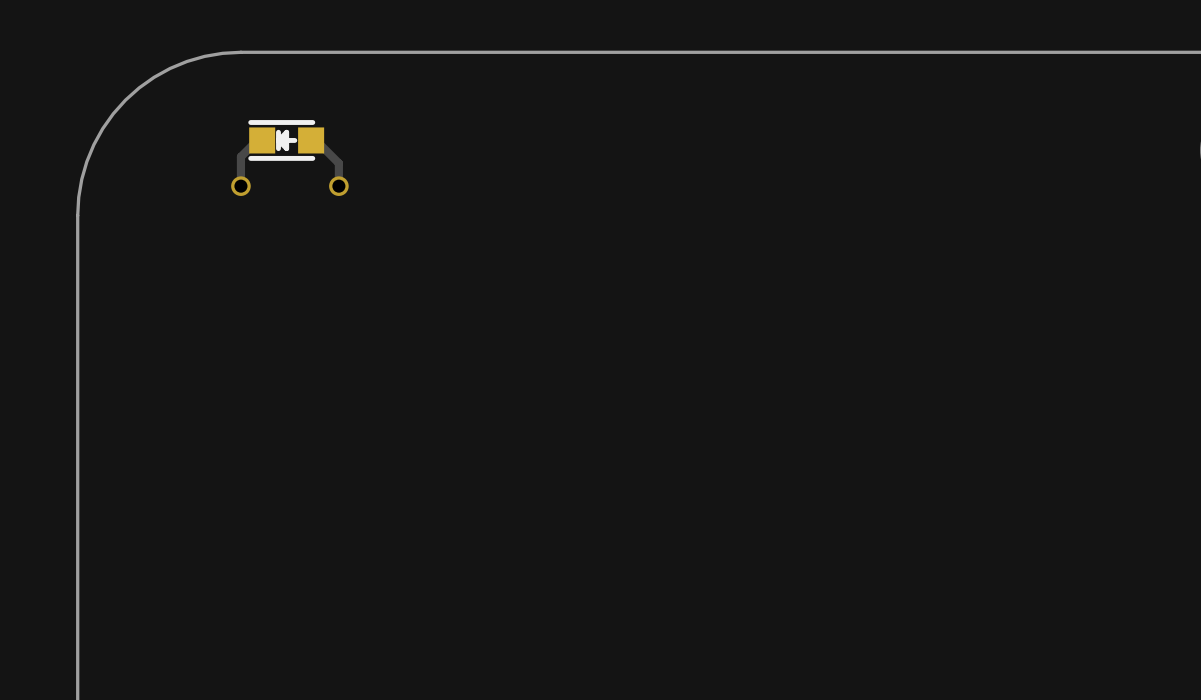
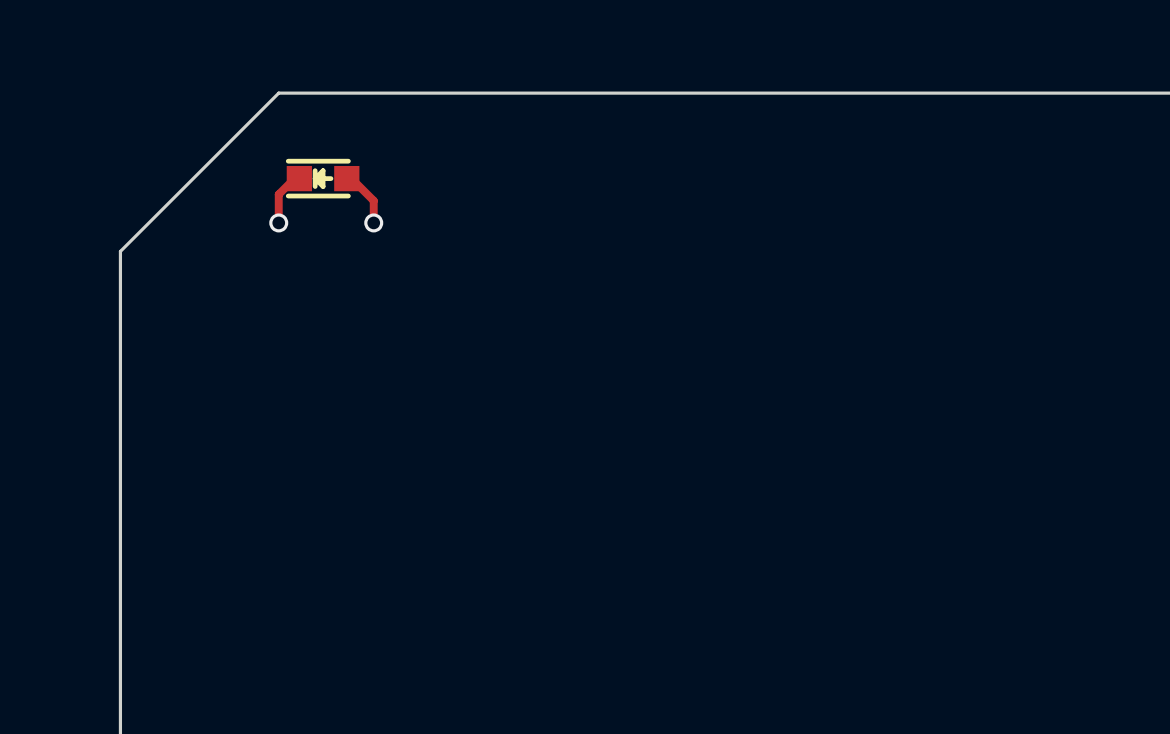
board edge: (240, 52) (222, 53) (187, 61) (154, 77) (125, 100) (102, 128) (86, 161) (78, 197) (77, 215) -> (278, 93) (120, 251)

